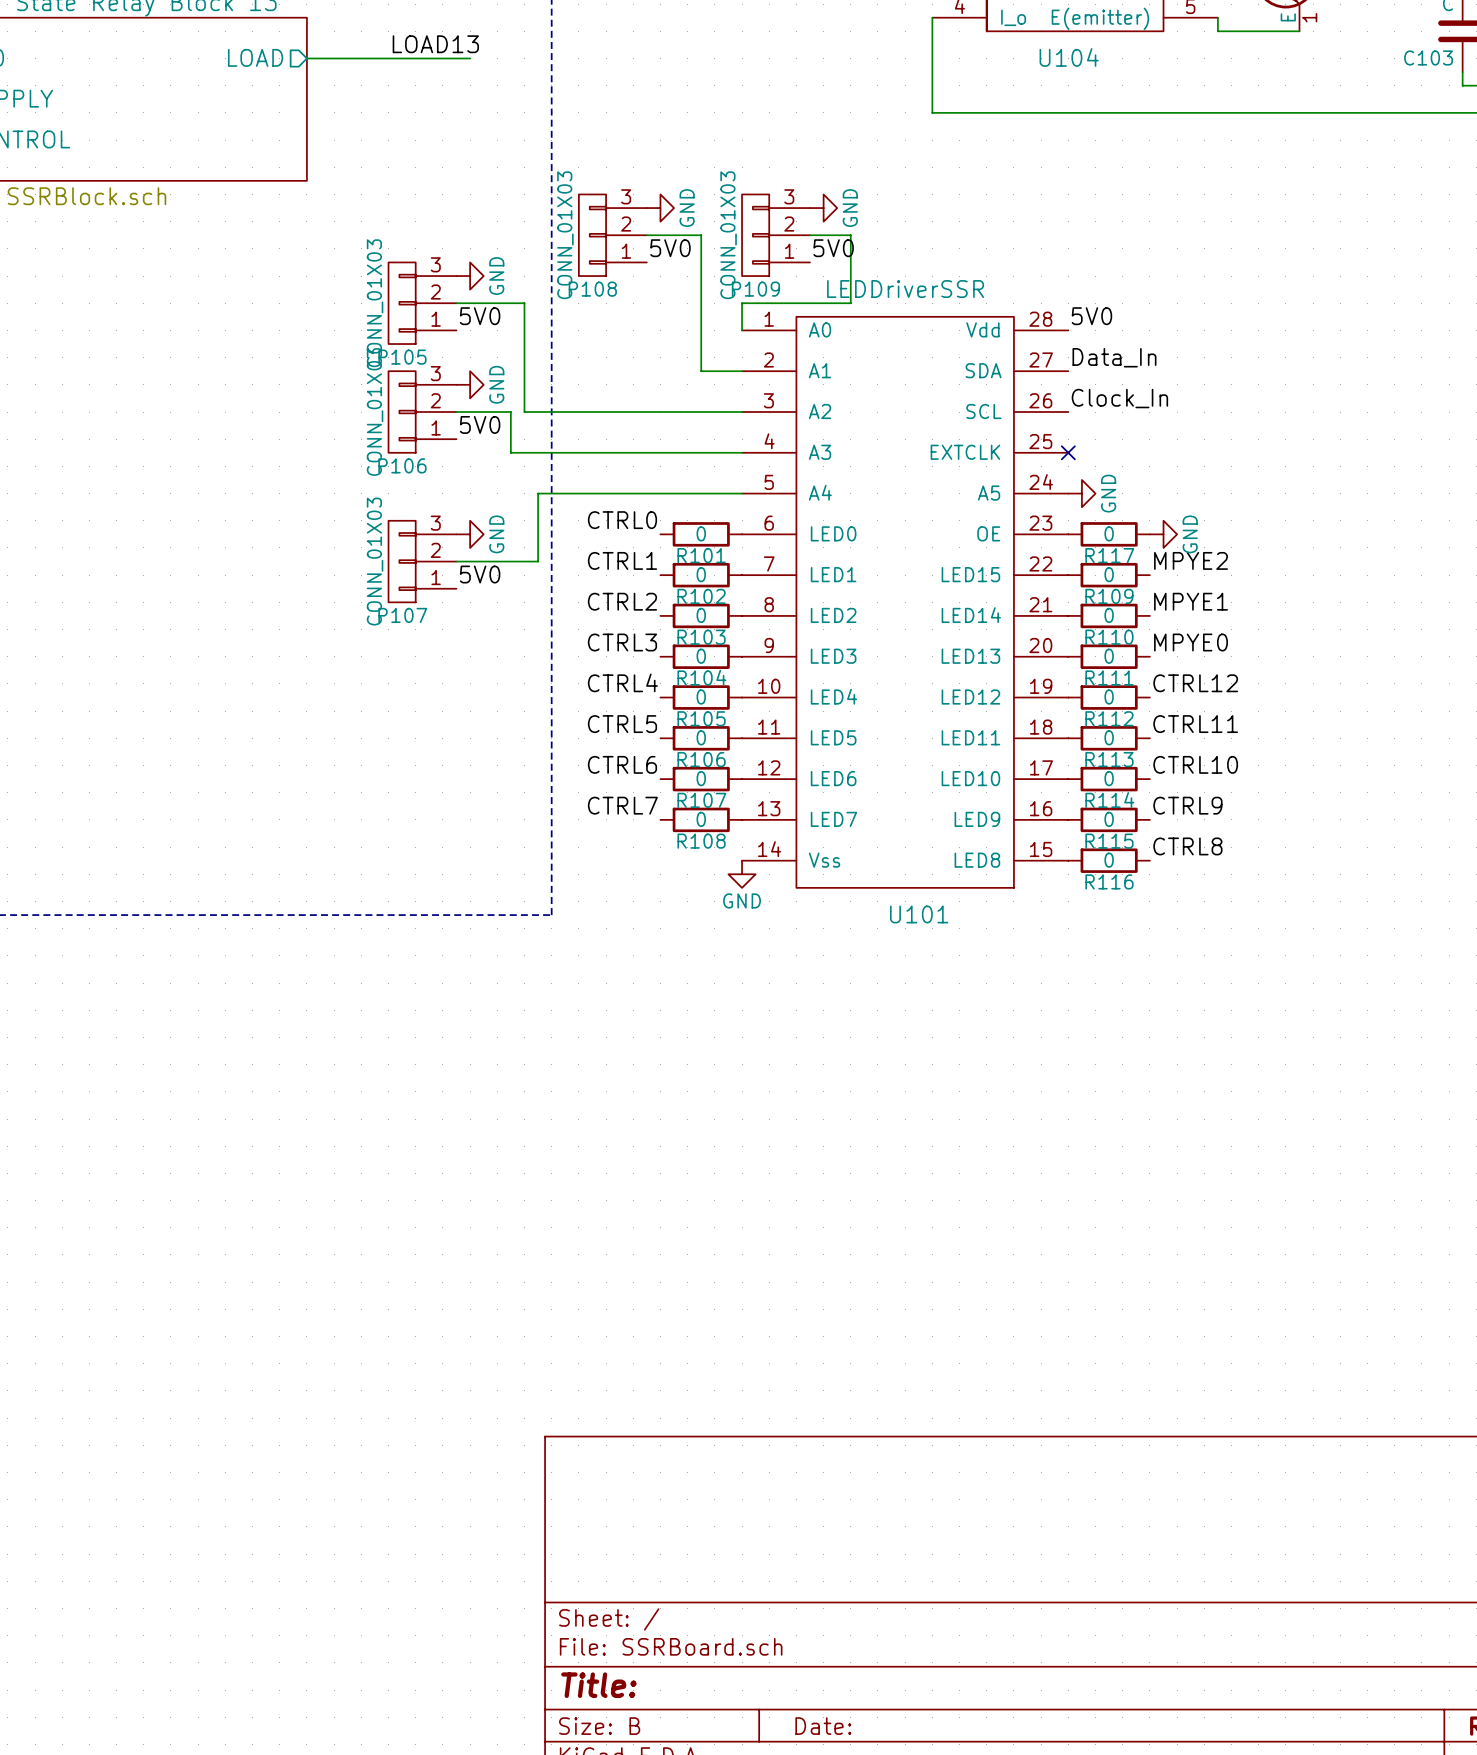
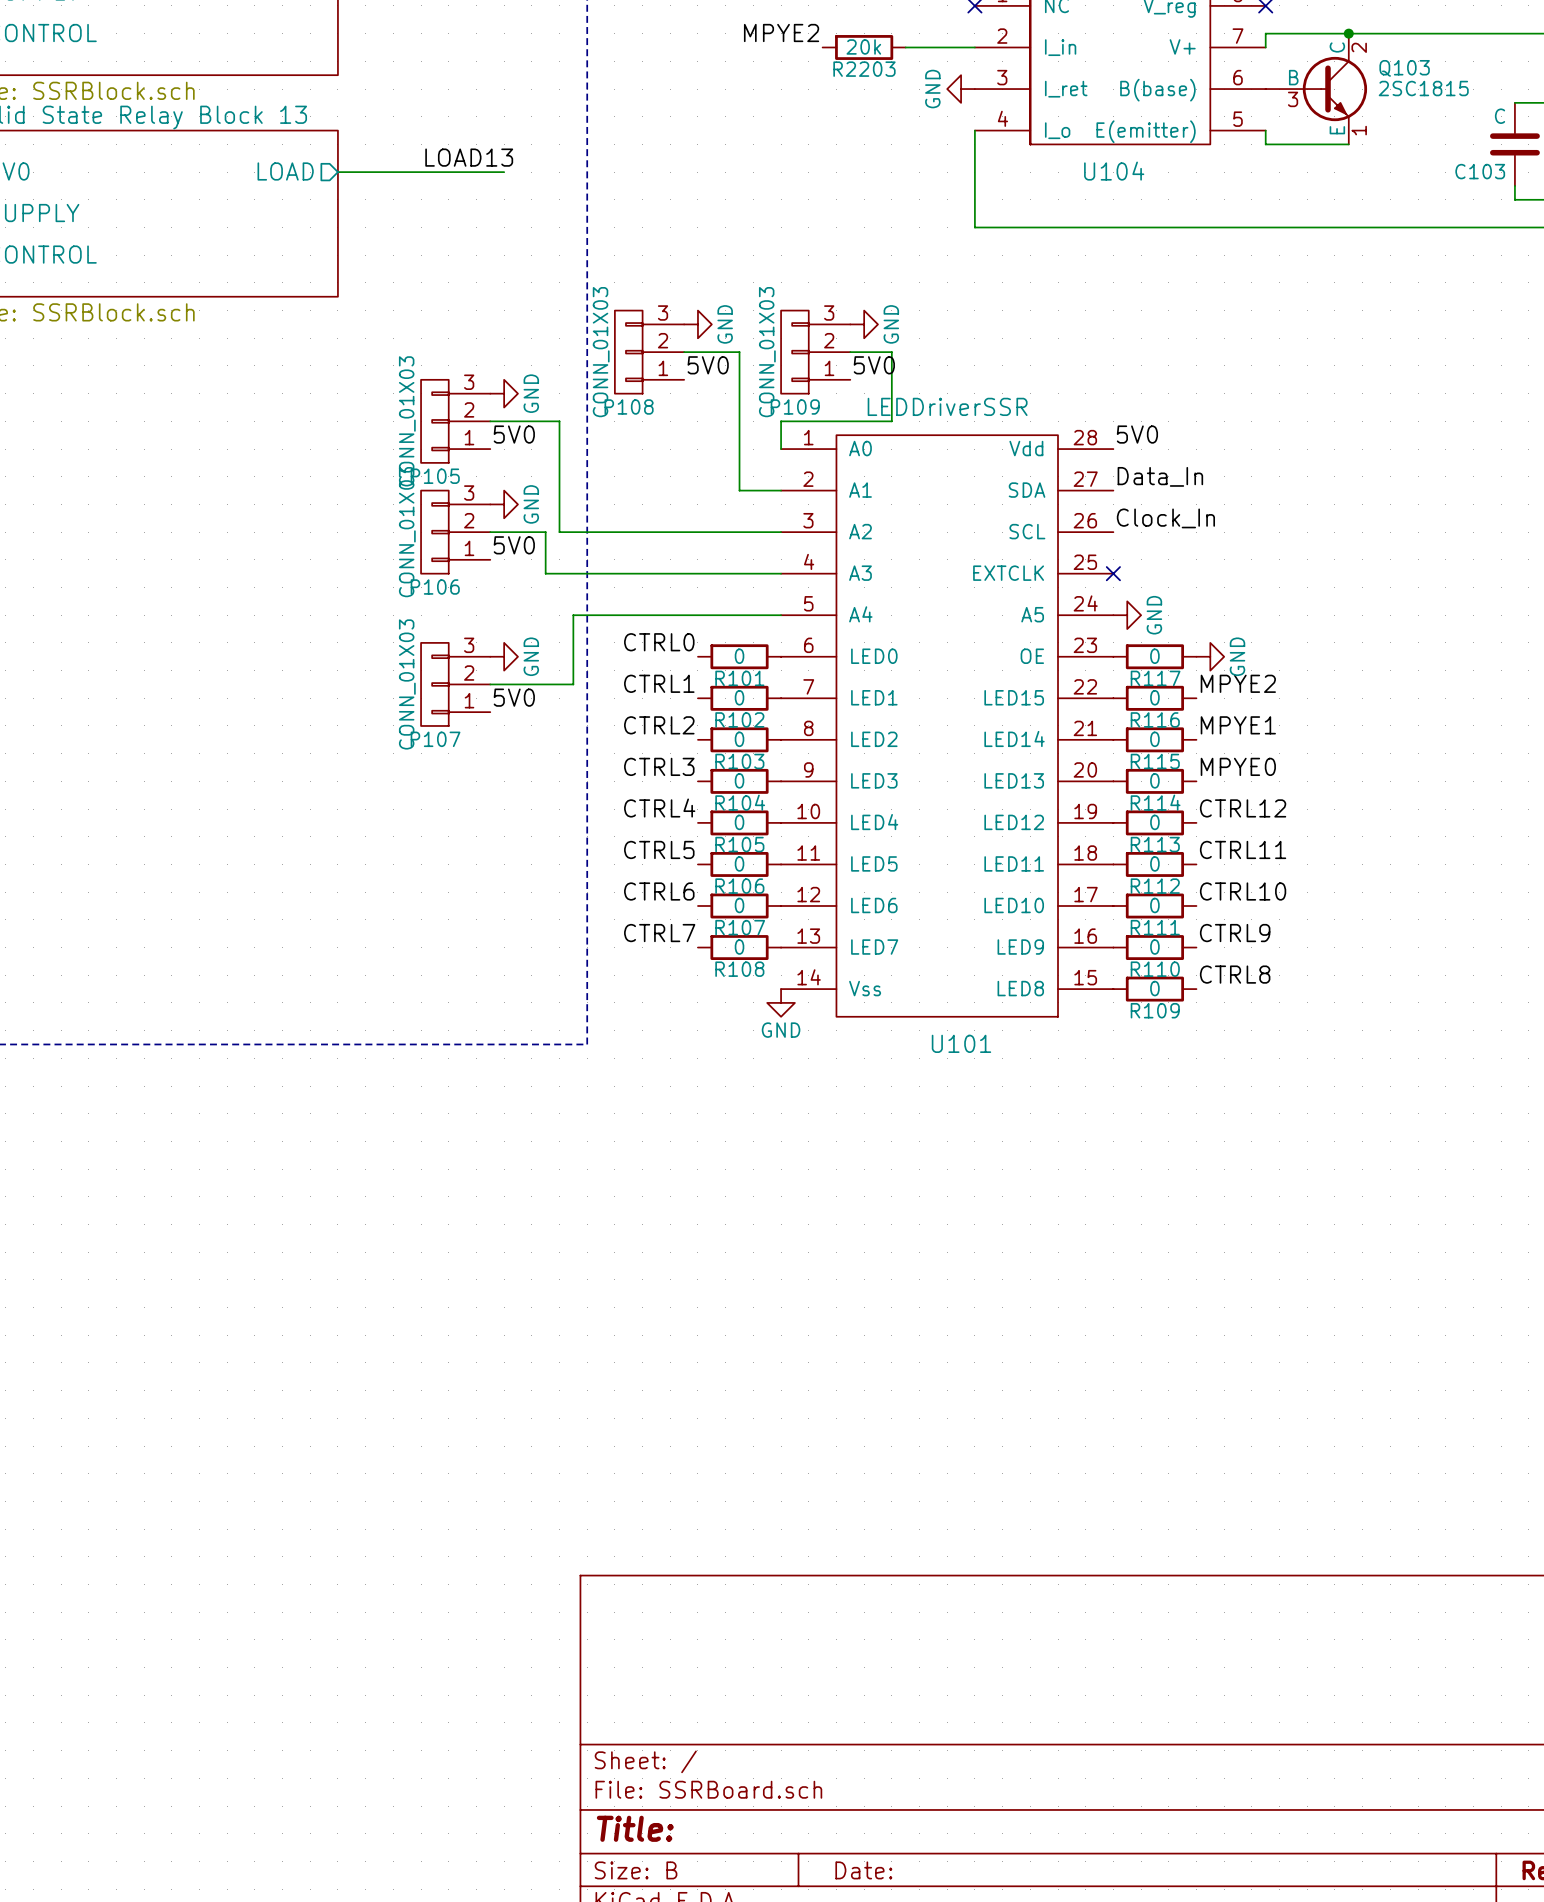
R109 name: R109 (1109, 596) -> R116 (1155, 719)
R110 name: R110 (1109, 637) -> R115 (1155, 761)
R111 name: R111 (1109, 677) -> R114 (1155, 802)
R112 name: R112 (1109, 718) -> R113 (1155, 844)
R113 name: R113 (1109, 759) -> R112 (1155, 886)
R114 name: R114 (1109, 800) -> R111 (1155, 927)
R115 name: R115 (1109, 841) -> R110 (1155, 969)
R116 name: R116 (1109, 881) -> R109 (1155, 1010)

